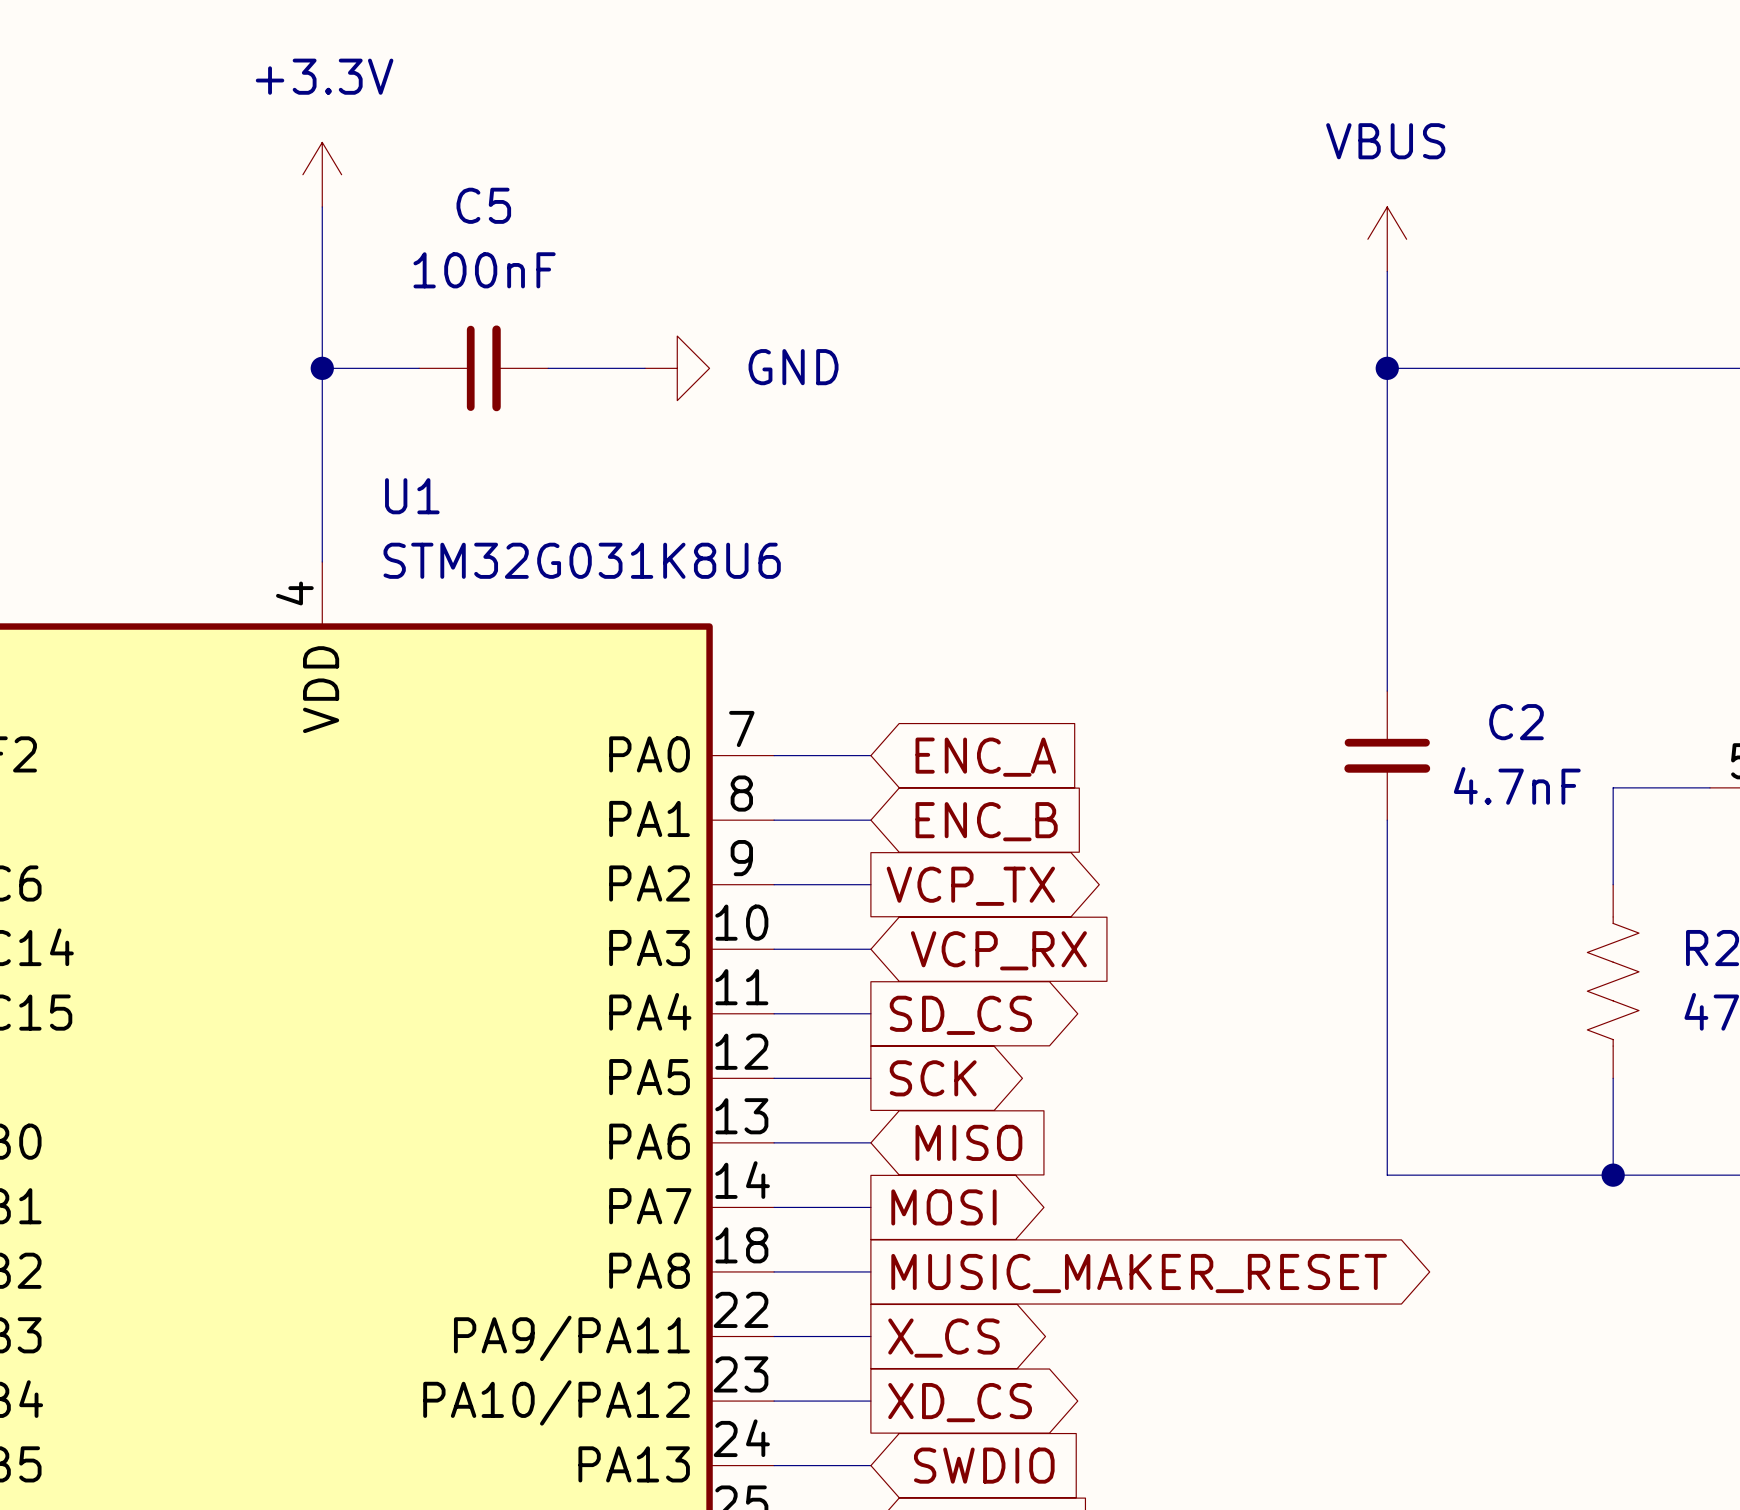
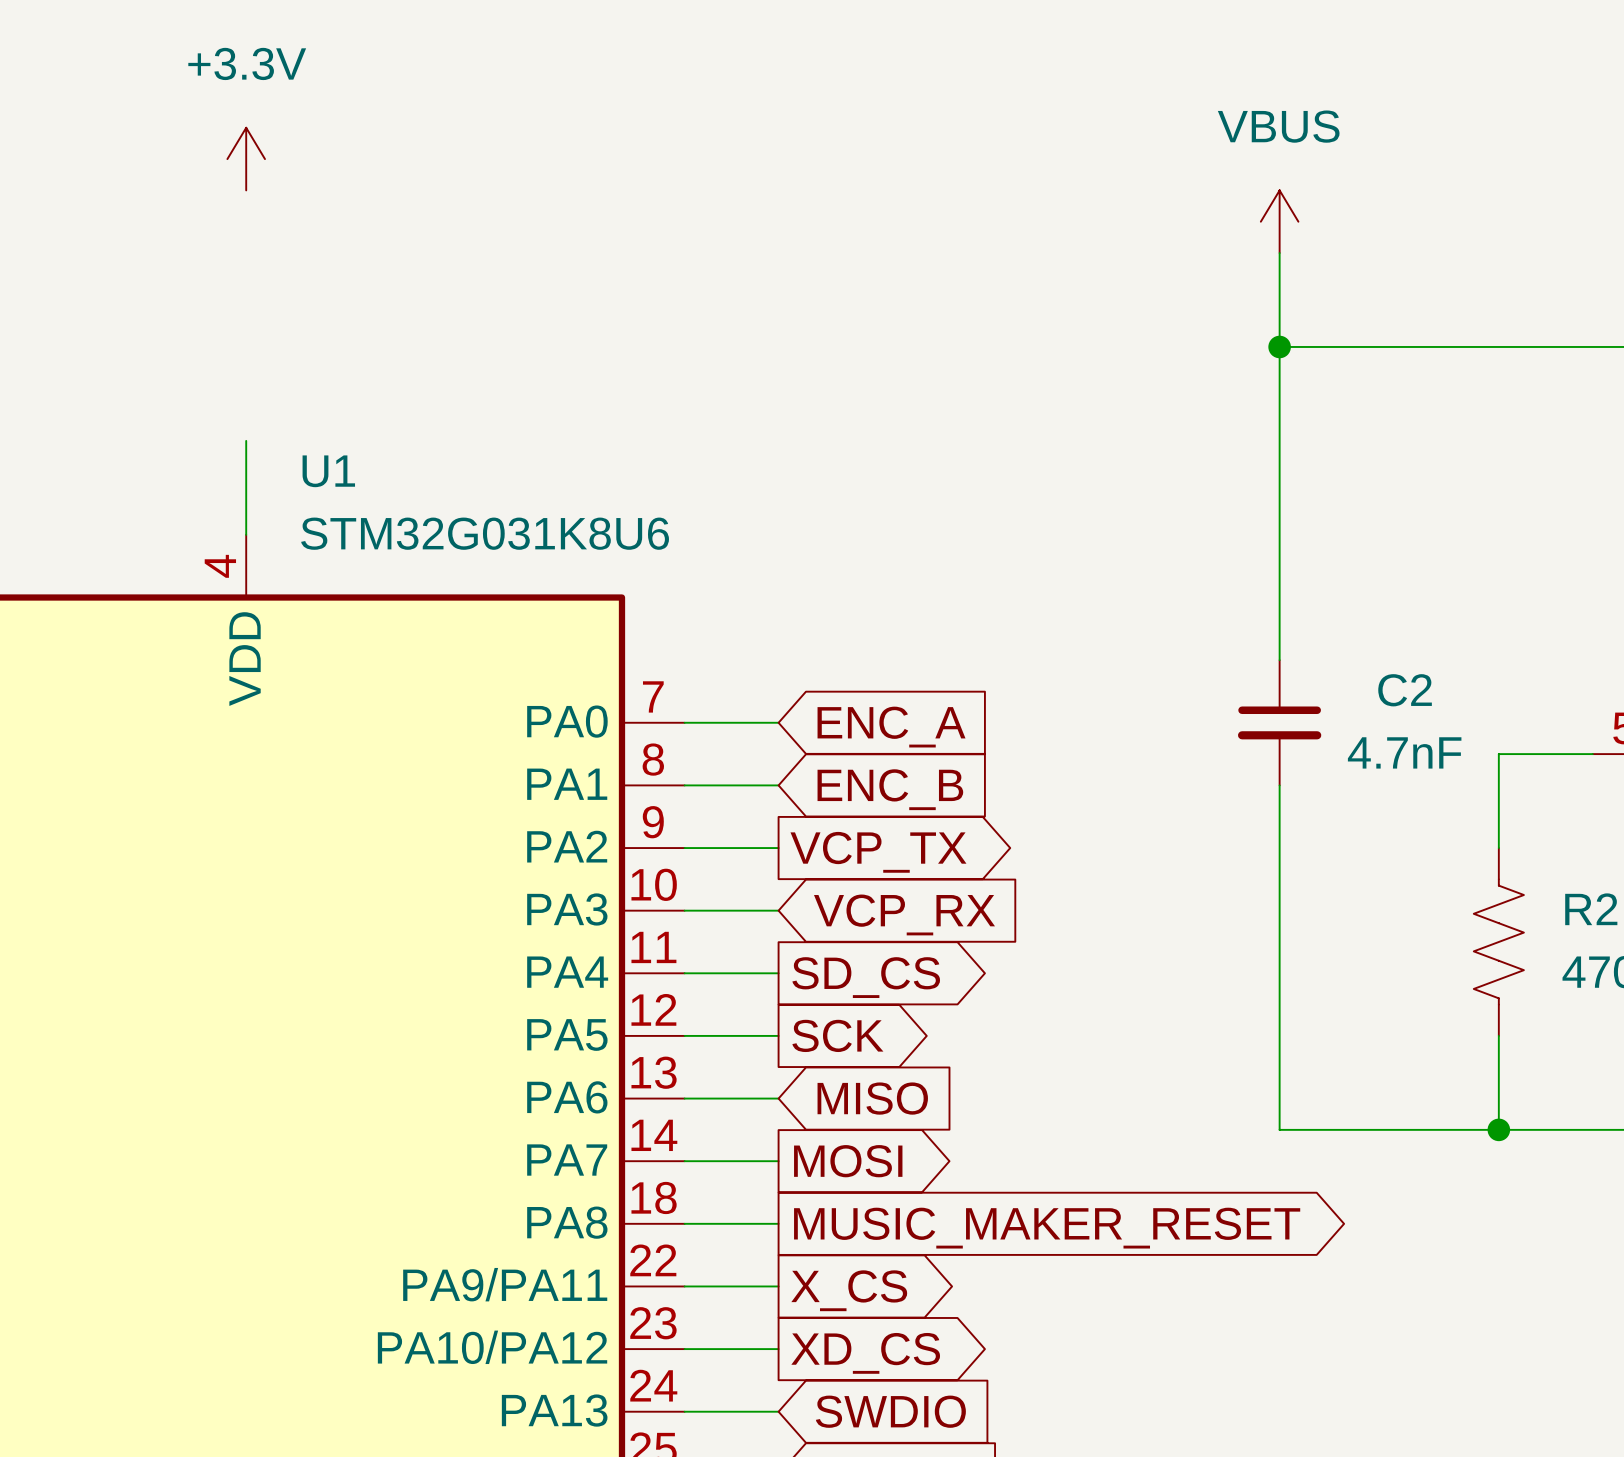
wire: (322, 206) (322, 465) -> none
wire: (322, 368) (419, 368) -> none
junction: (322, 368) -> none
C5: 100nF (483, 368) -> none
wire: (548, 368) (645, 368) -> none
power symbol: GND (677, 368) -> none

